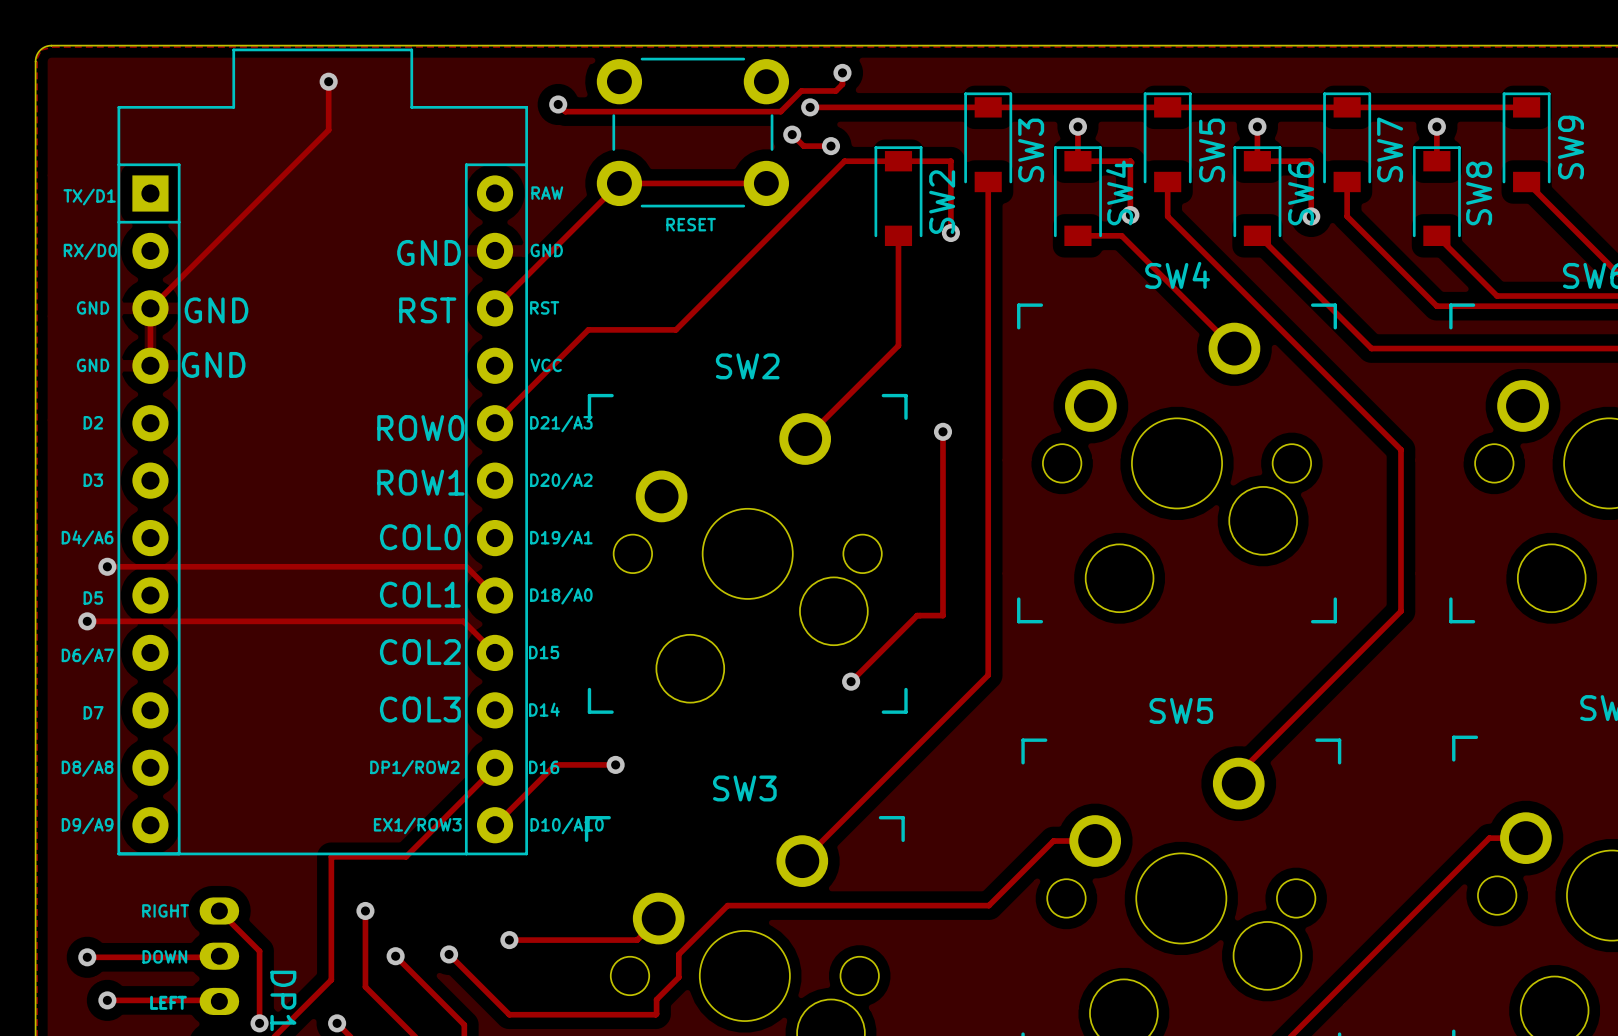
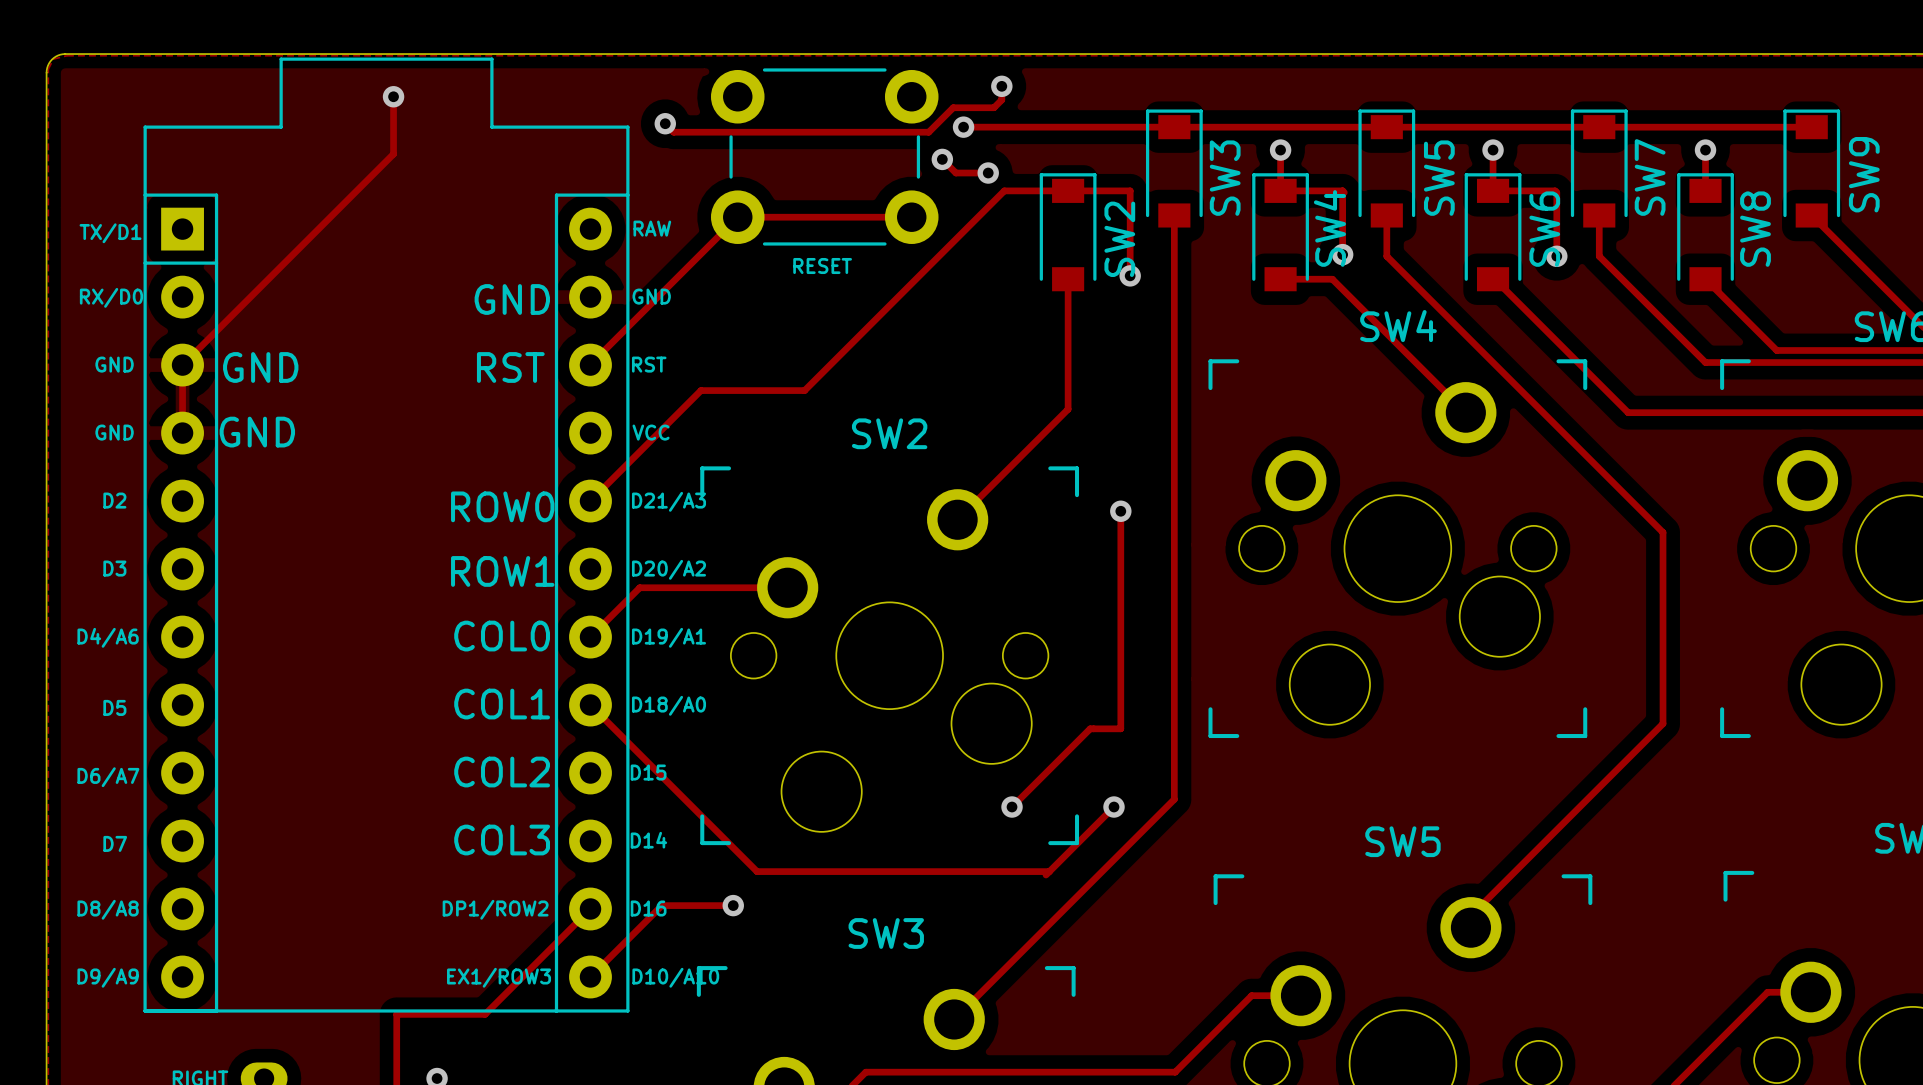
track: none -> (787, 587) (639, 587) (590, 637)
track: (107, 566) (466, 566) (495, 595) -> (1049, 871) (757, 871) (590, 705)
via: (107, 566) -> none
track: (87, 621) (463, 621) (495, 652) -> none
via: (87, 621) -> none
track: none -> (1114, 807) (1046, 875)
via: none -> (1114, 807)

